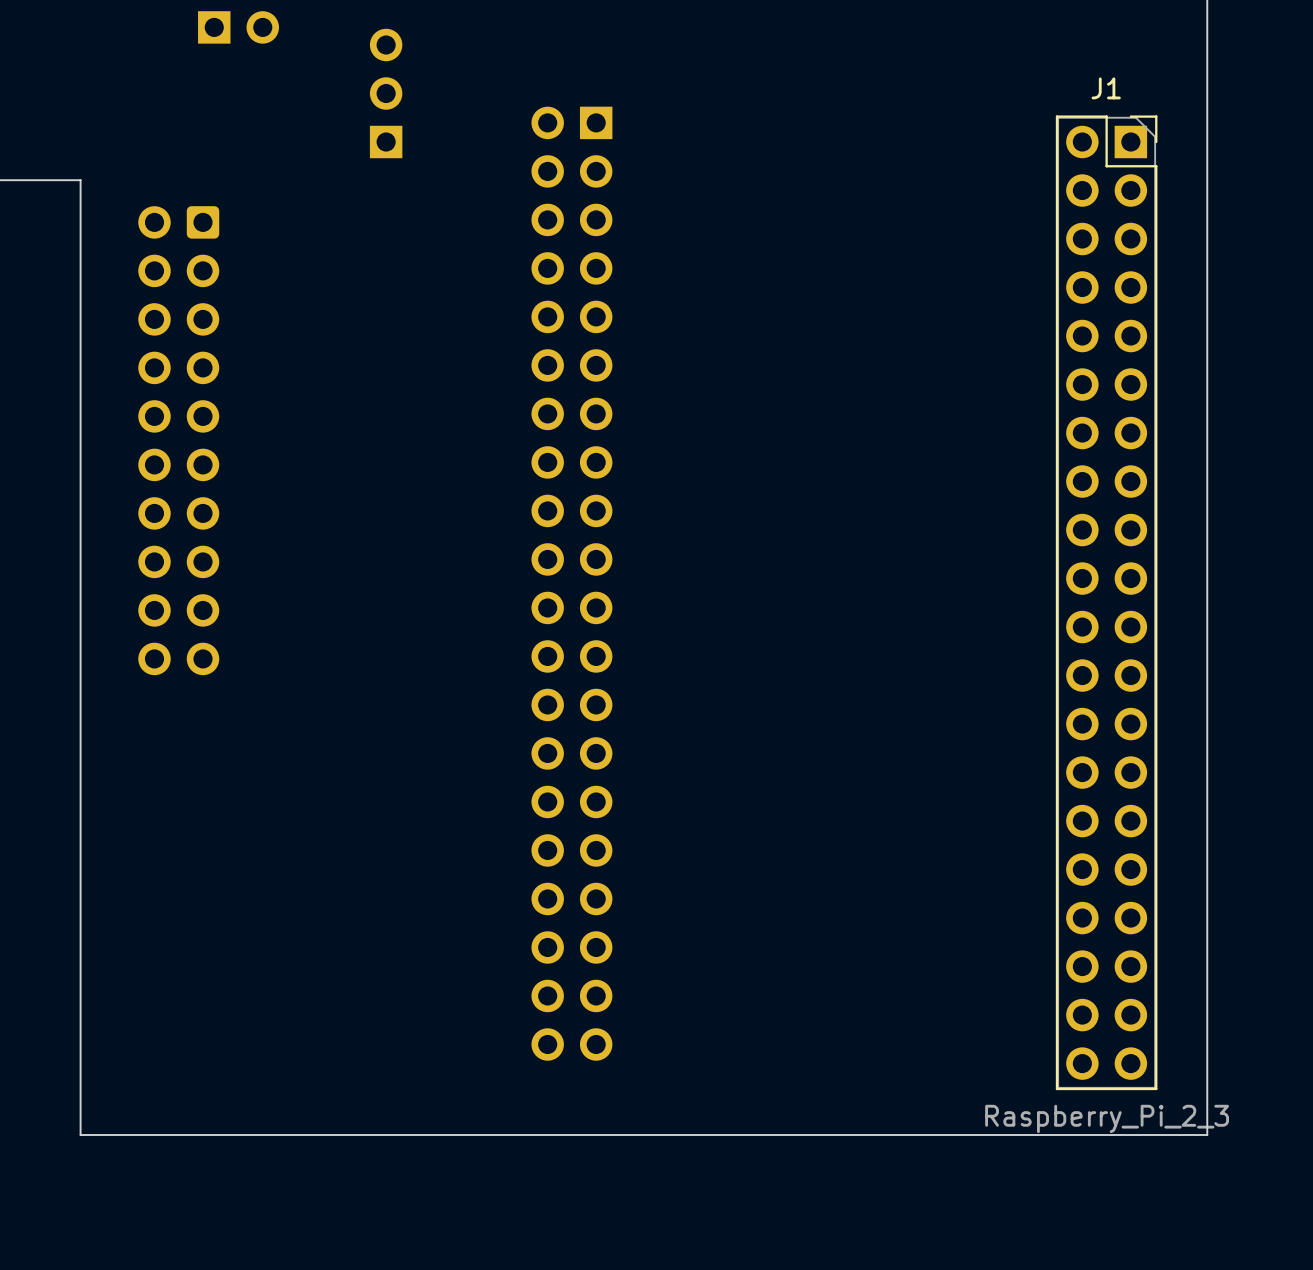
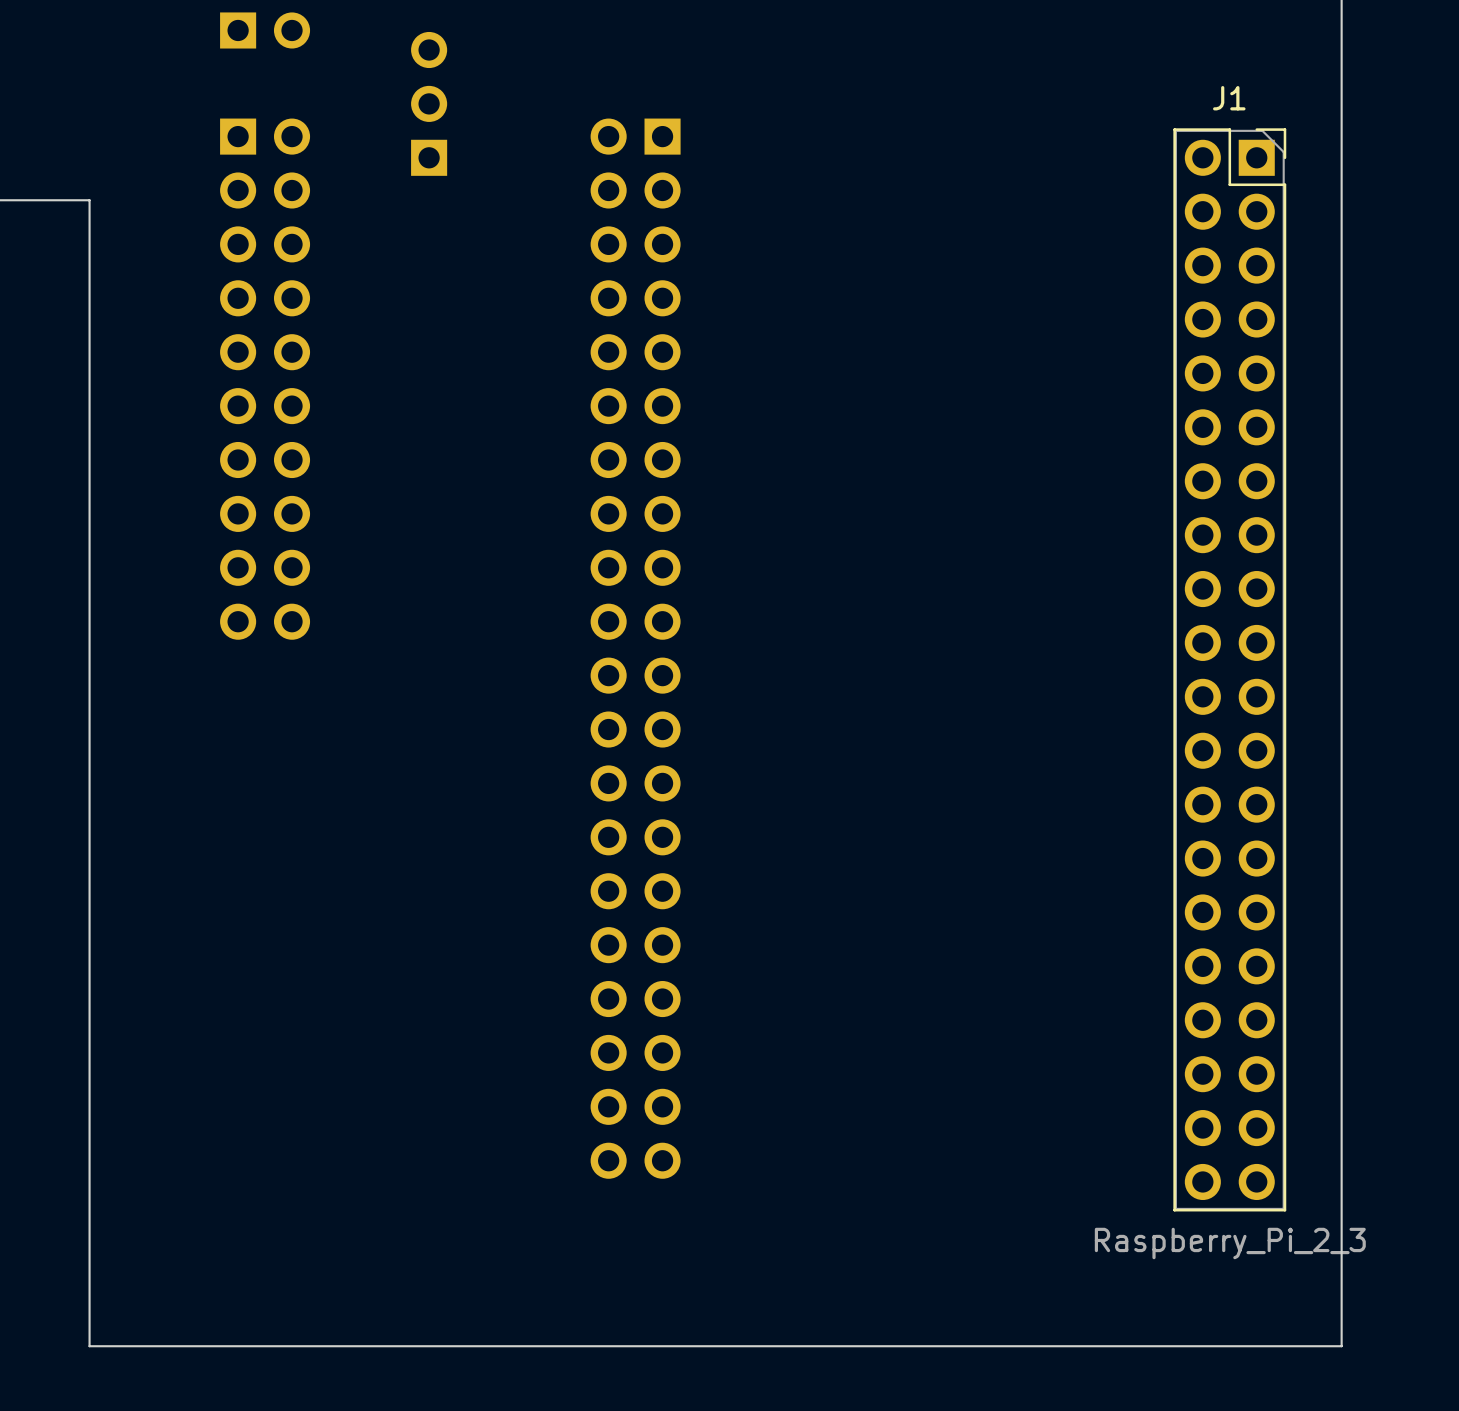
part: none -> (265, 379)
part: (178, 440) -> none
board edge: (1207, 1135) (80, 1135) -> (1341, 1261) (1341, 1346) (89, 1346) (89, 1261)

